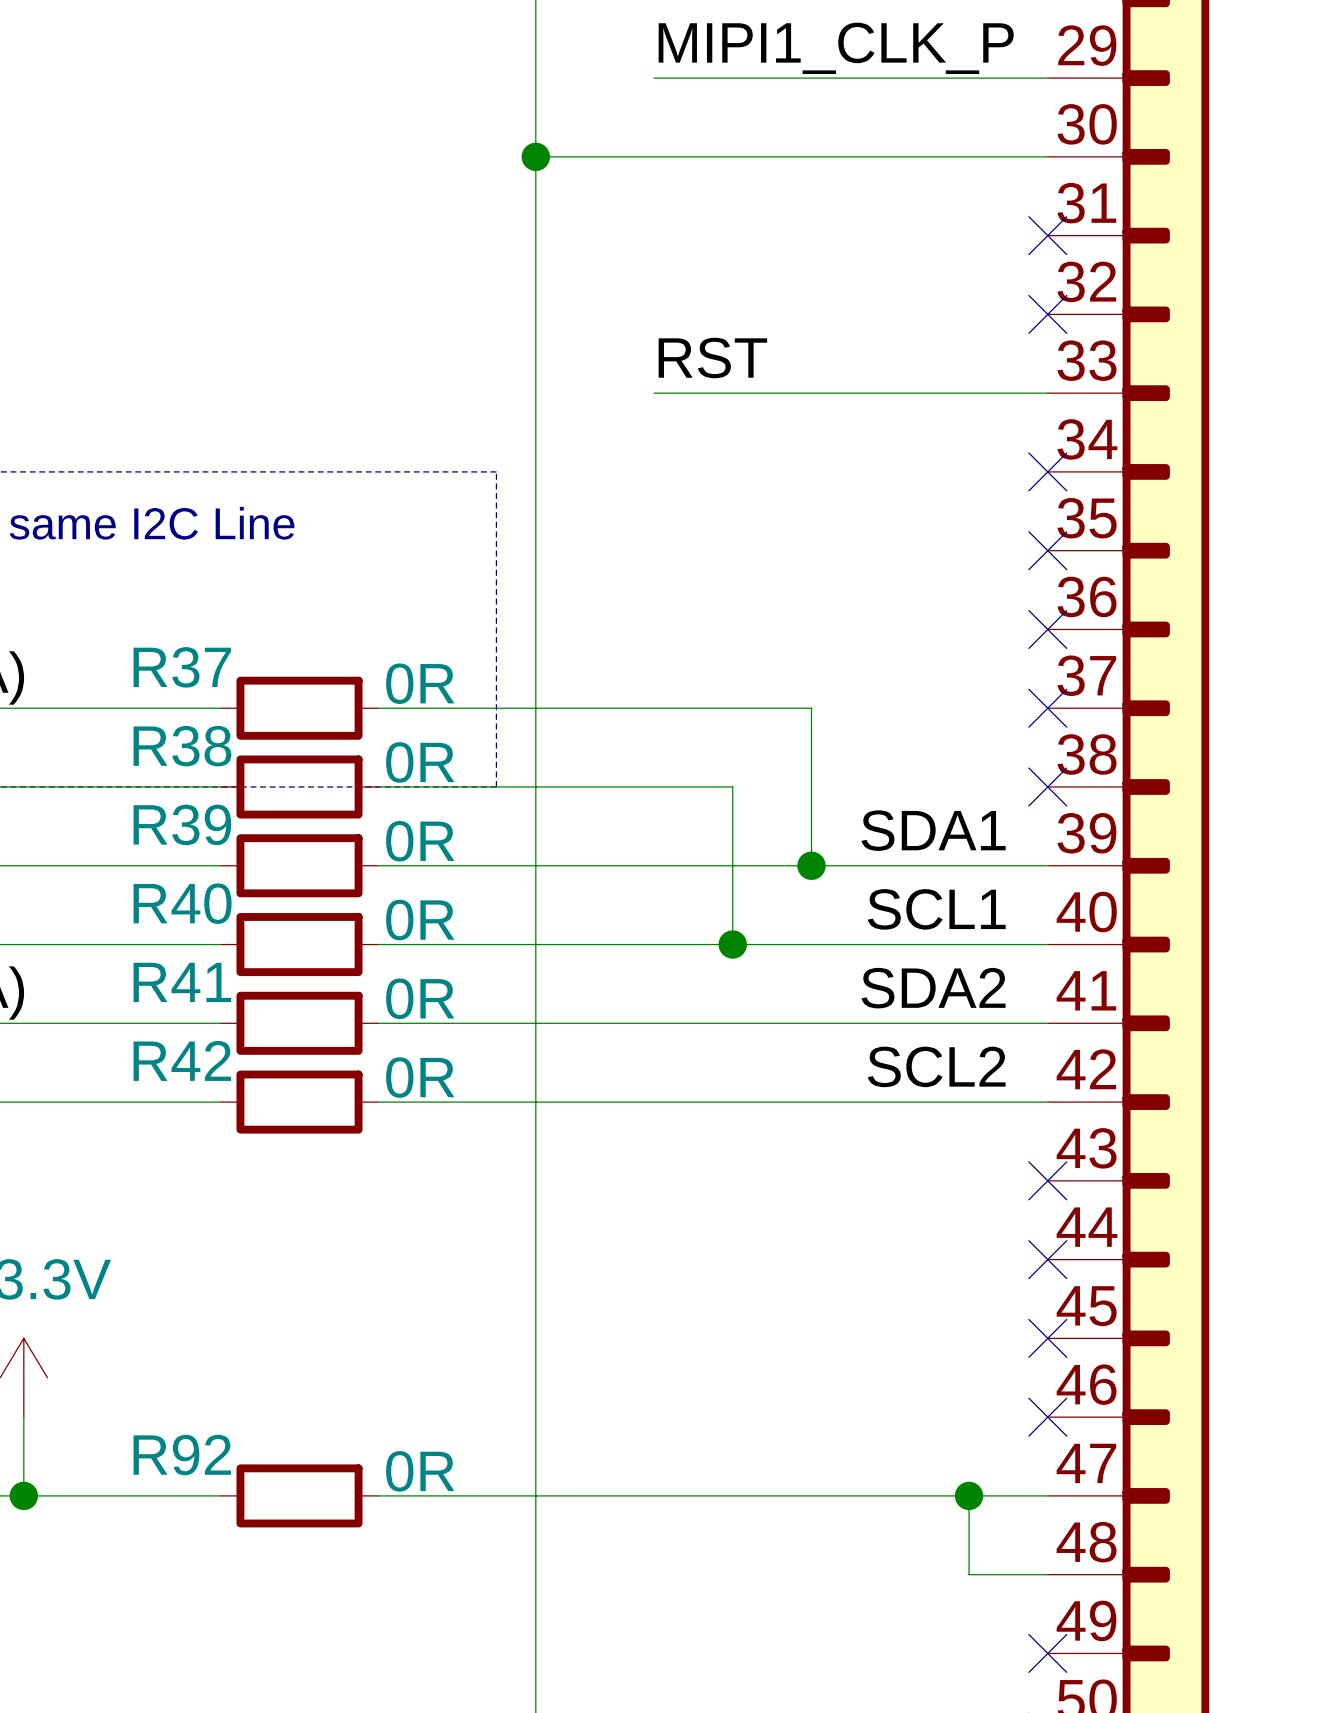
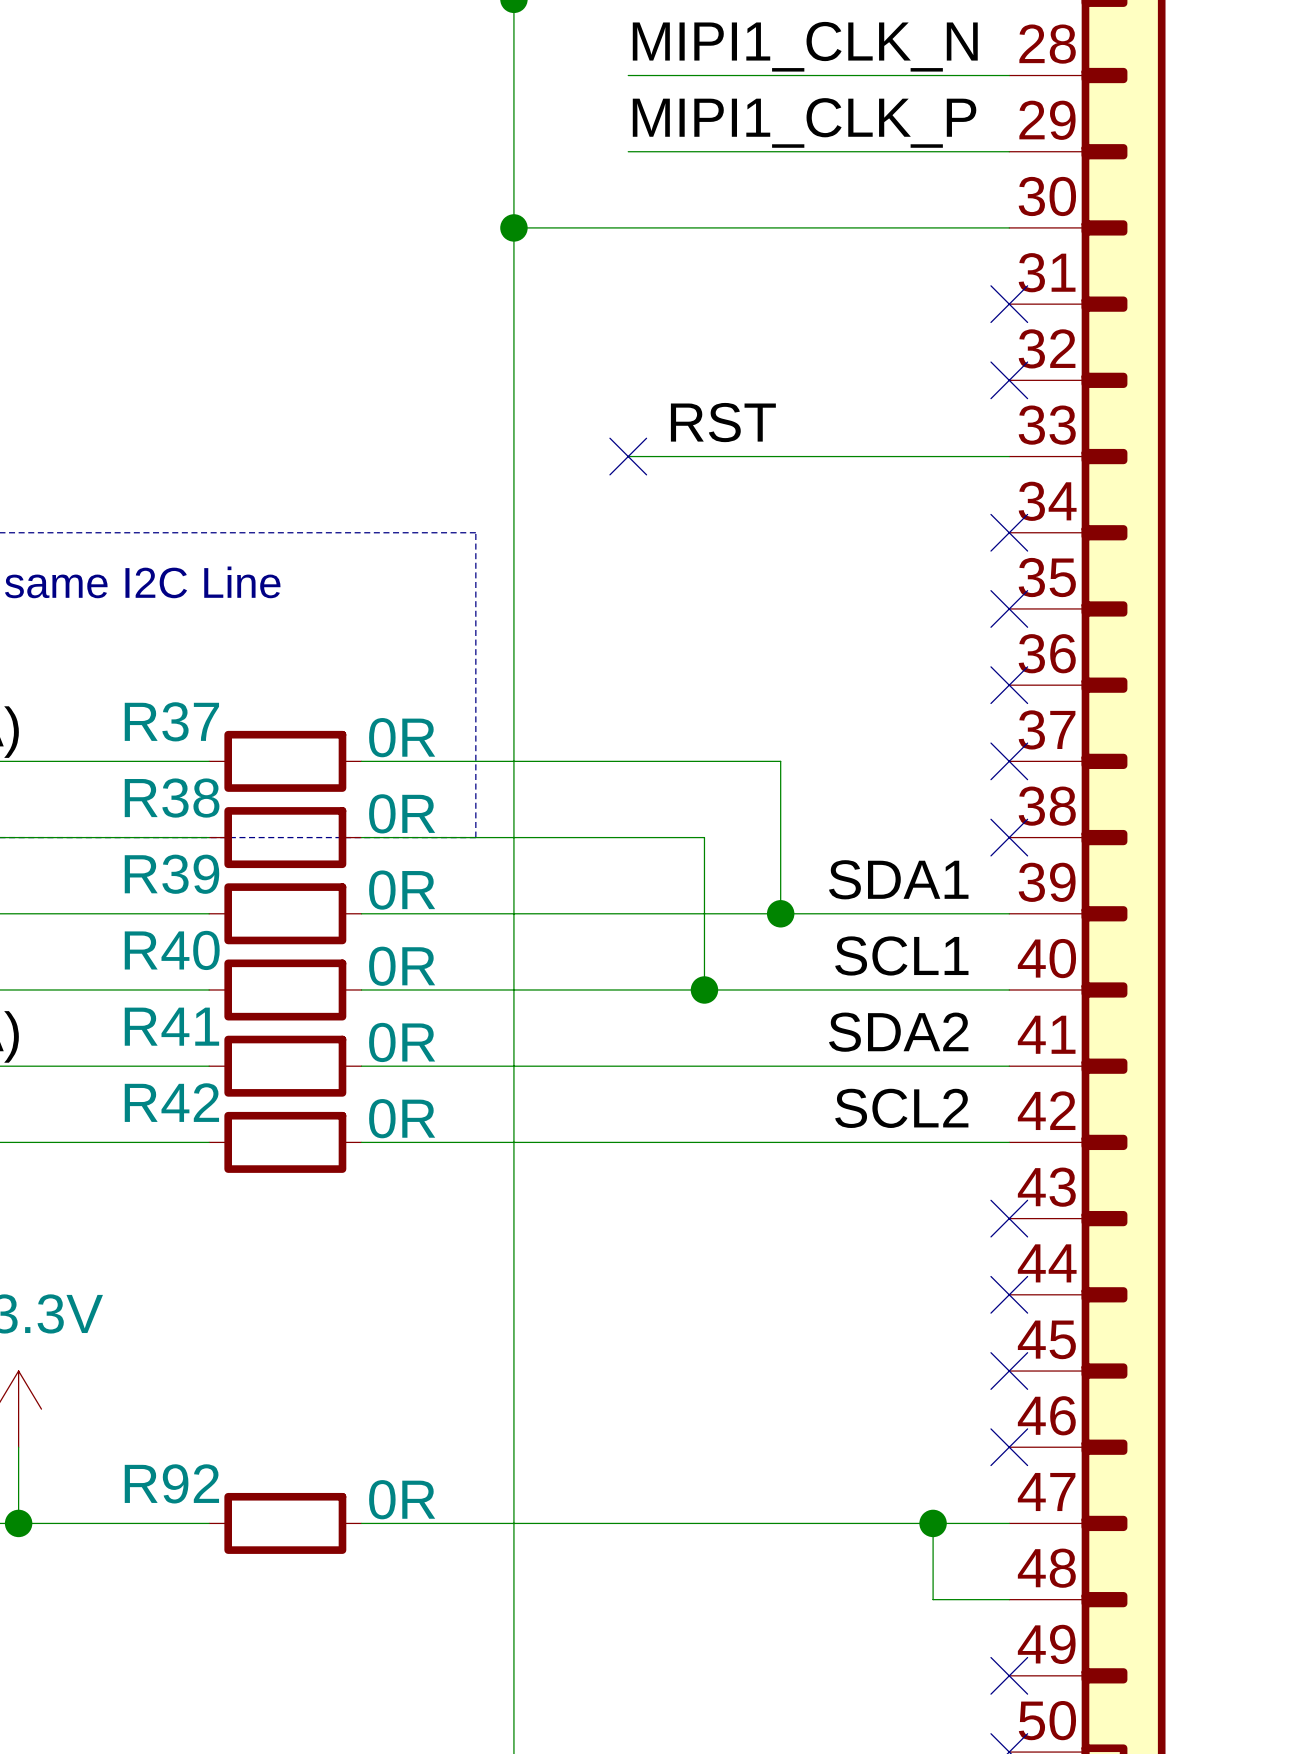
label position: RST (712, 358) -> RST (723, 422)
no-connect mark: none -> (628, 456)

